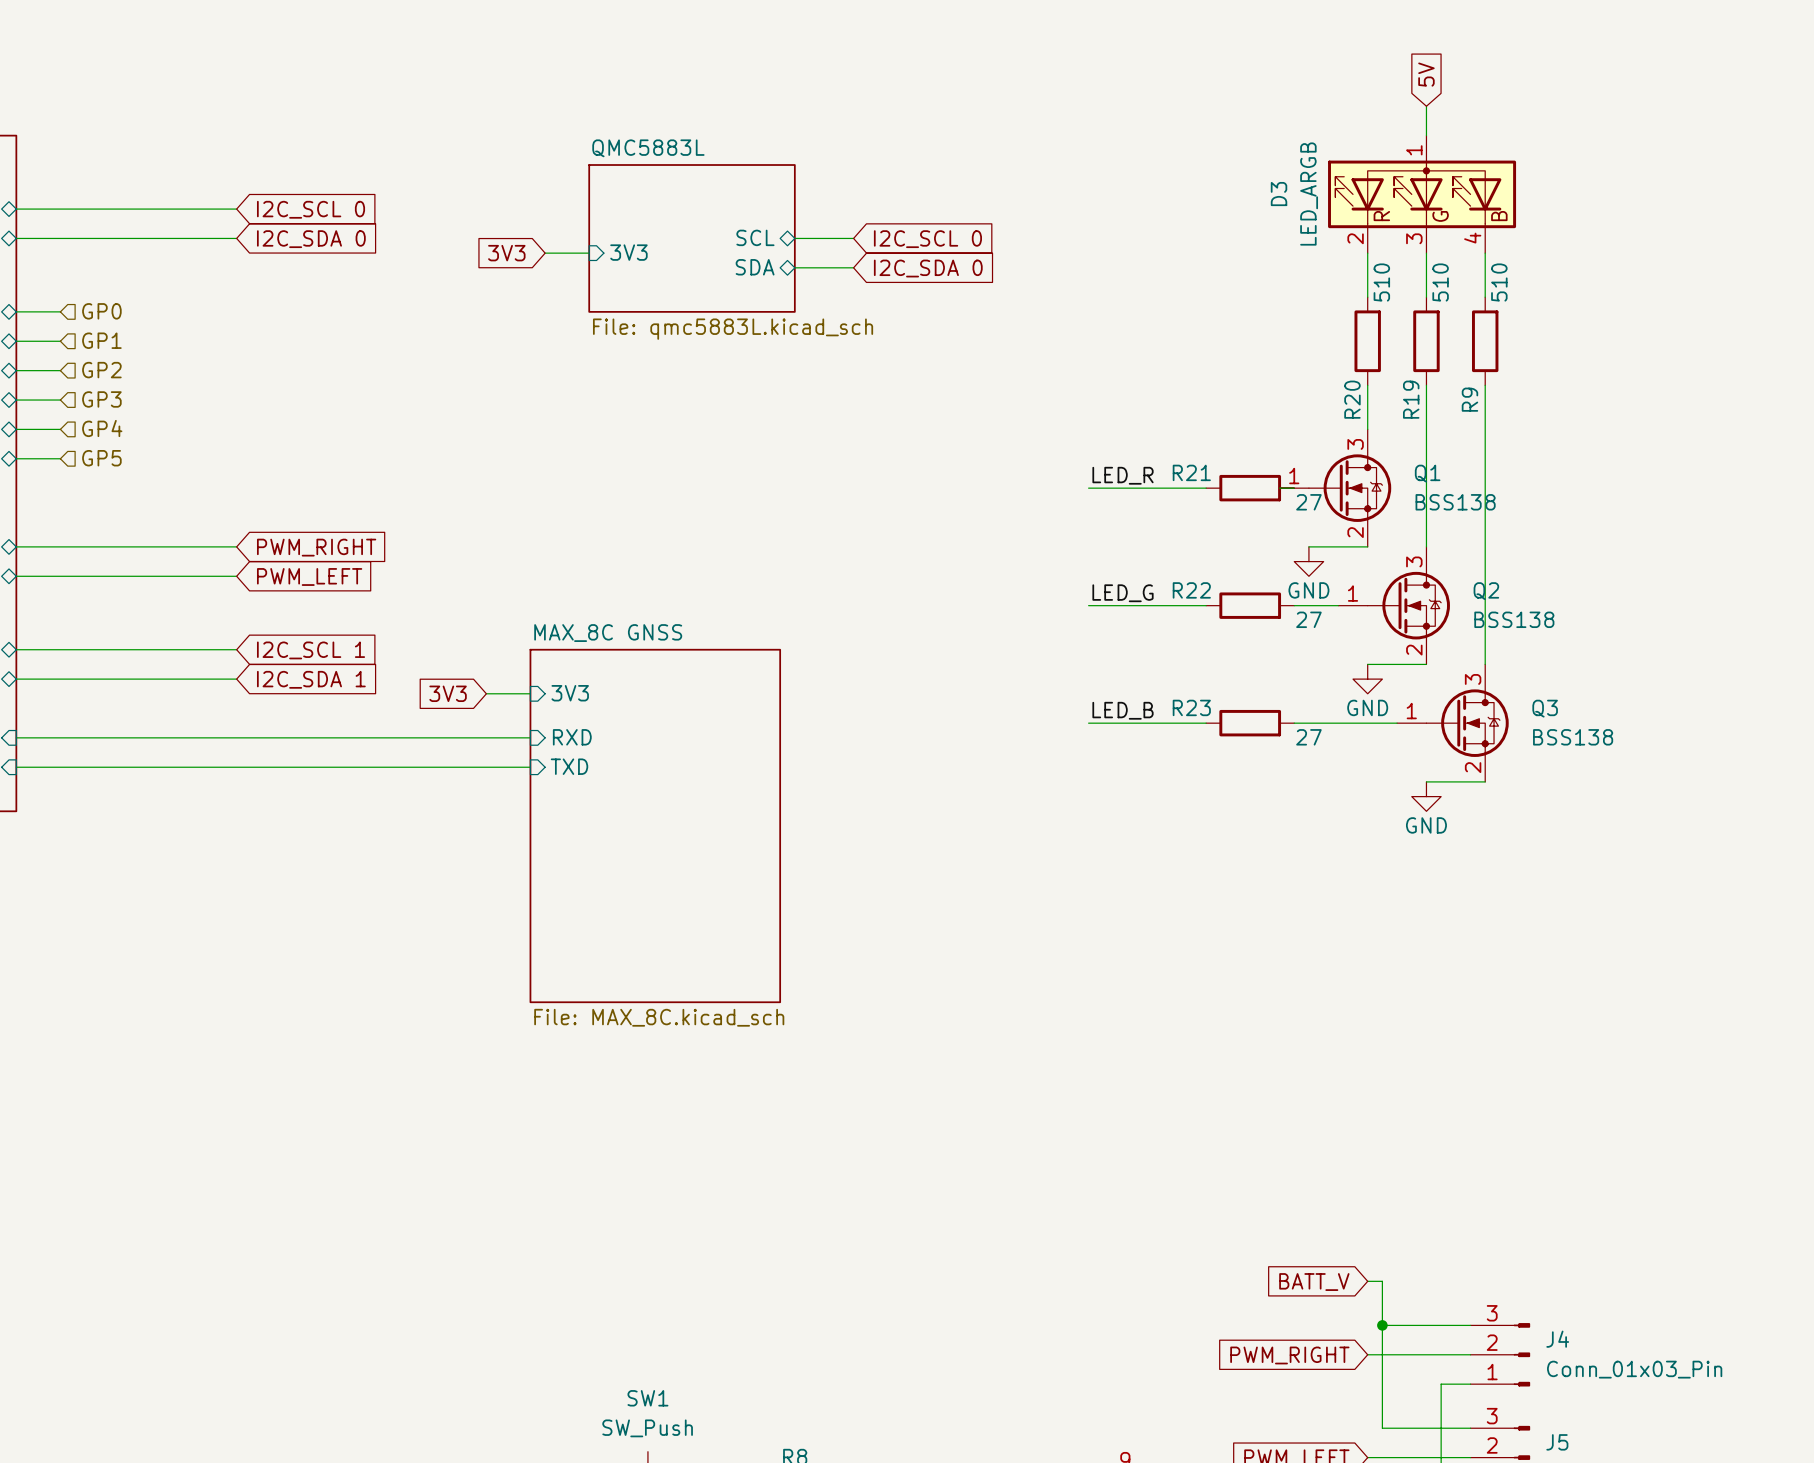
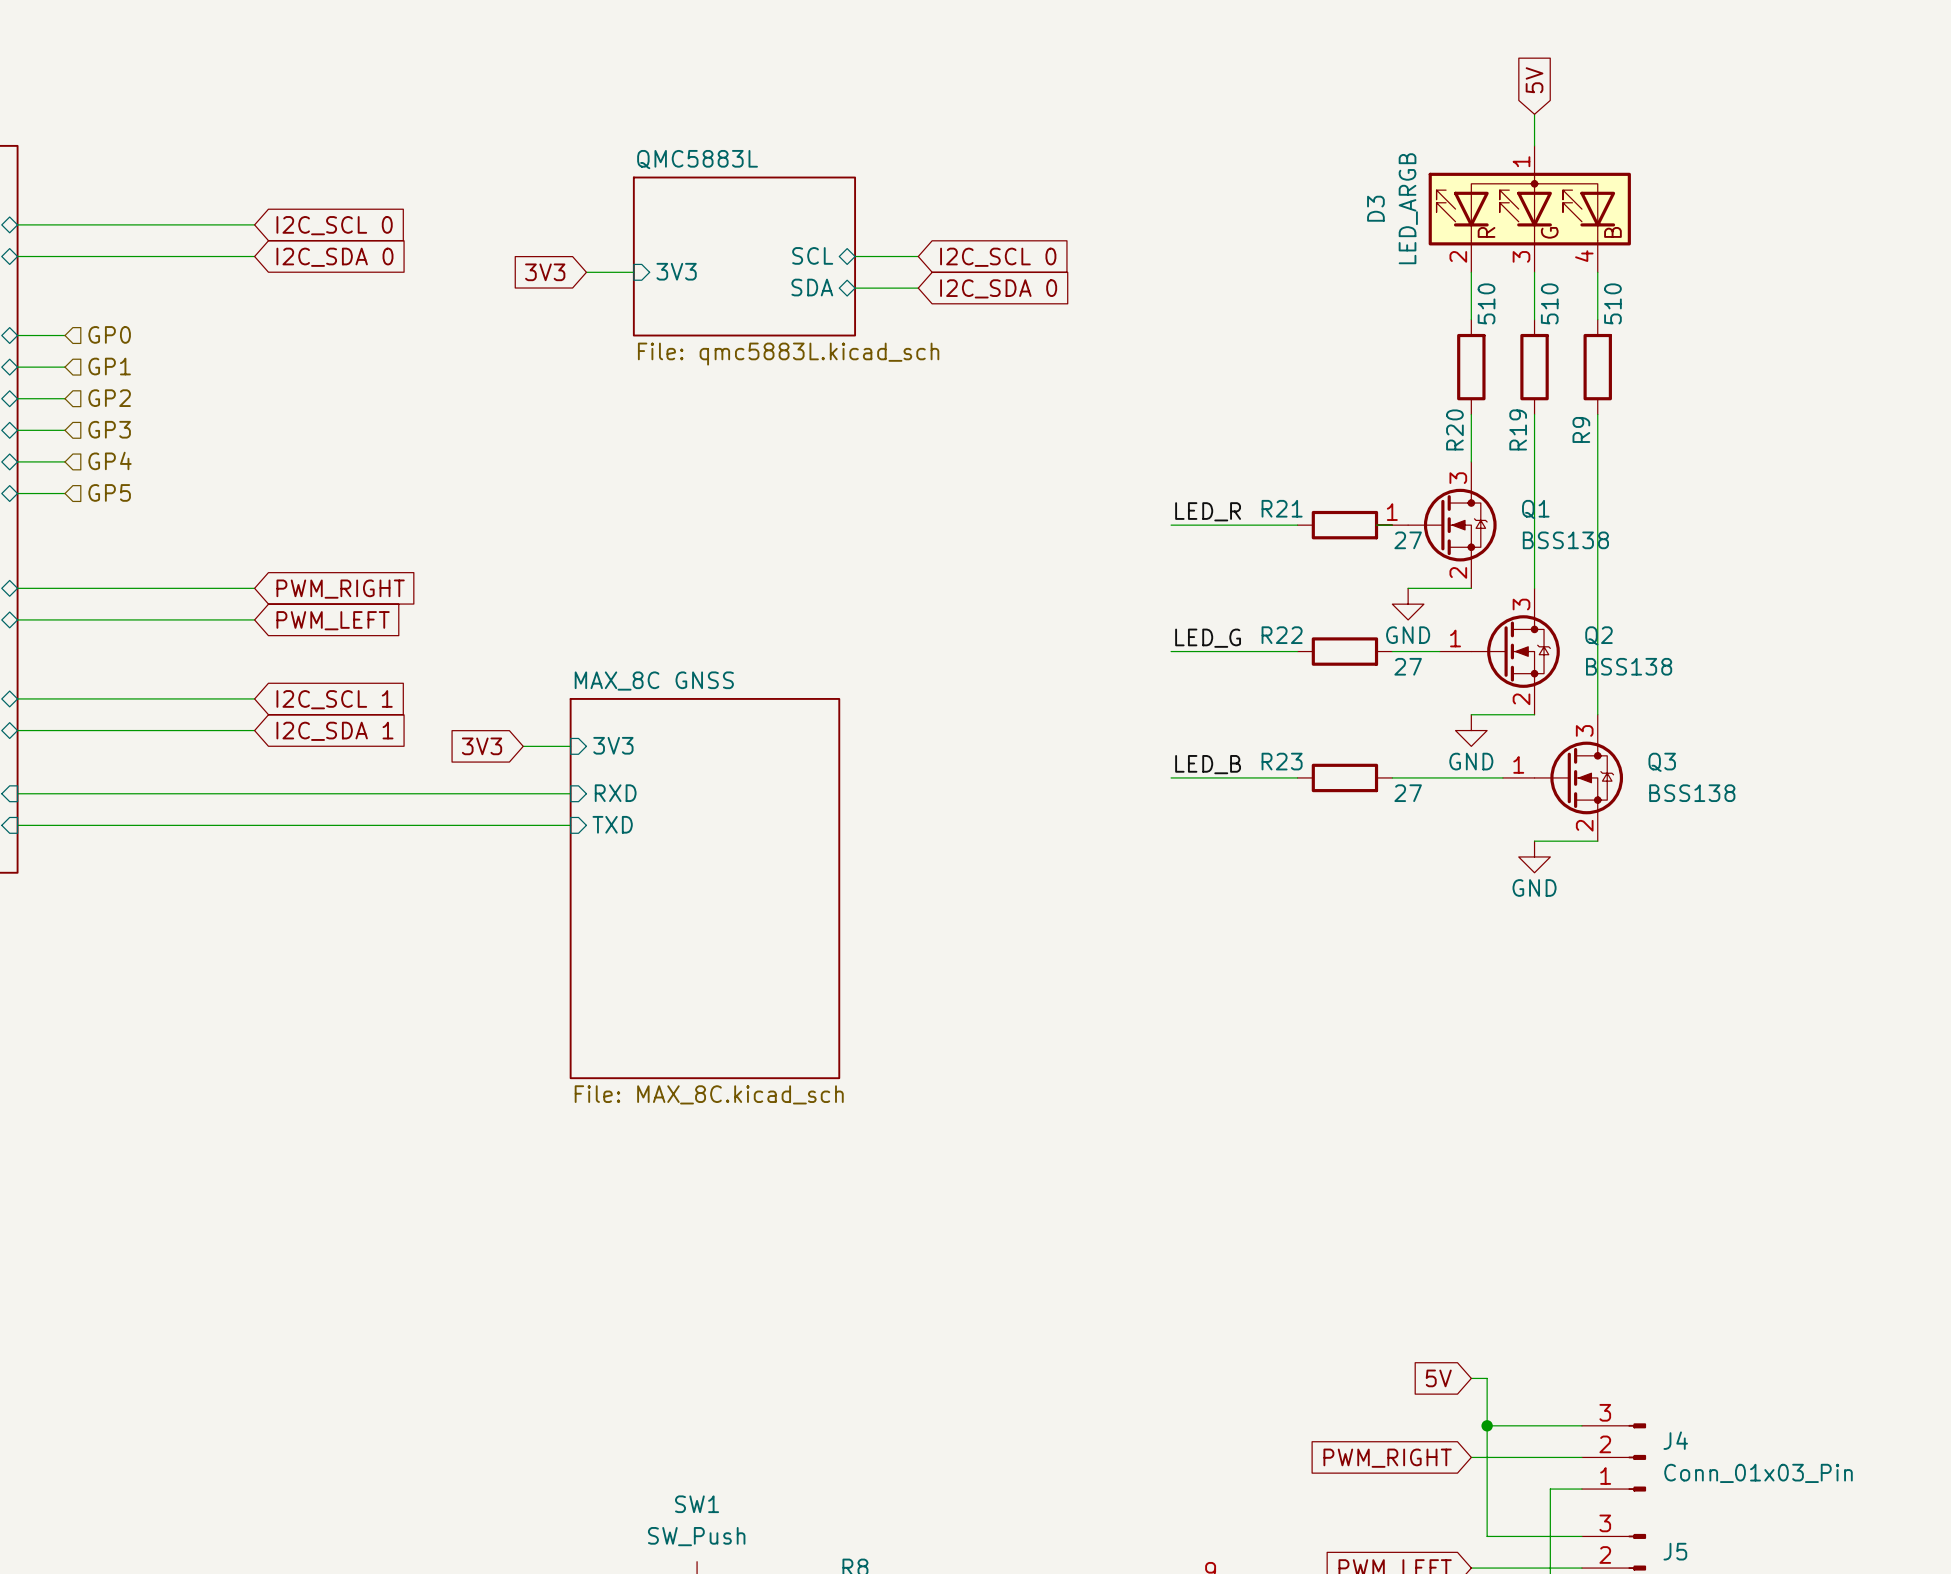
global label: BATT_V (1314, 1282) -> 5V (1438, 1378)

